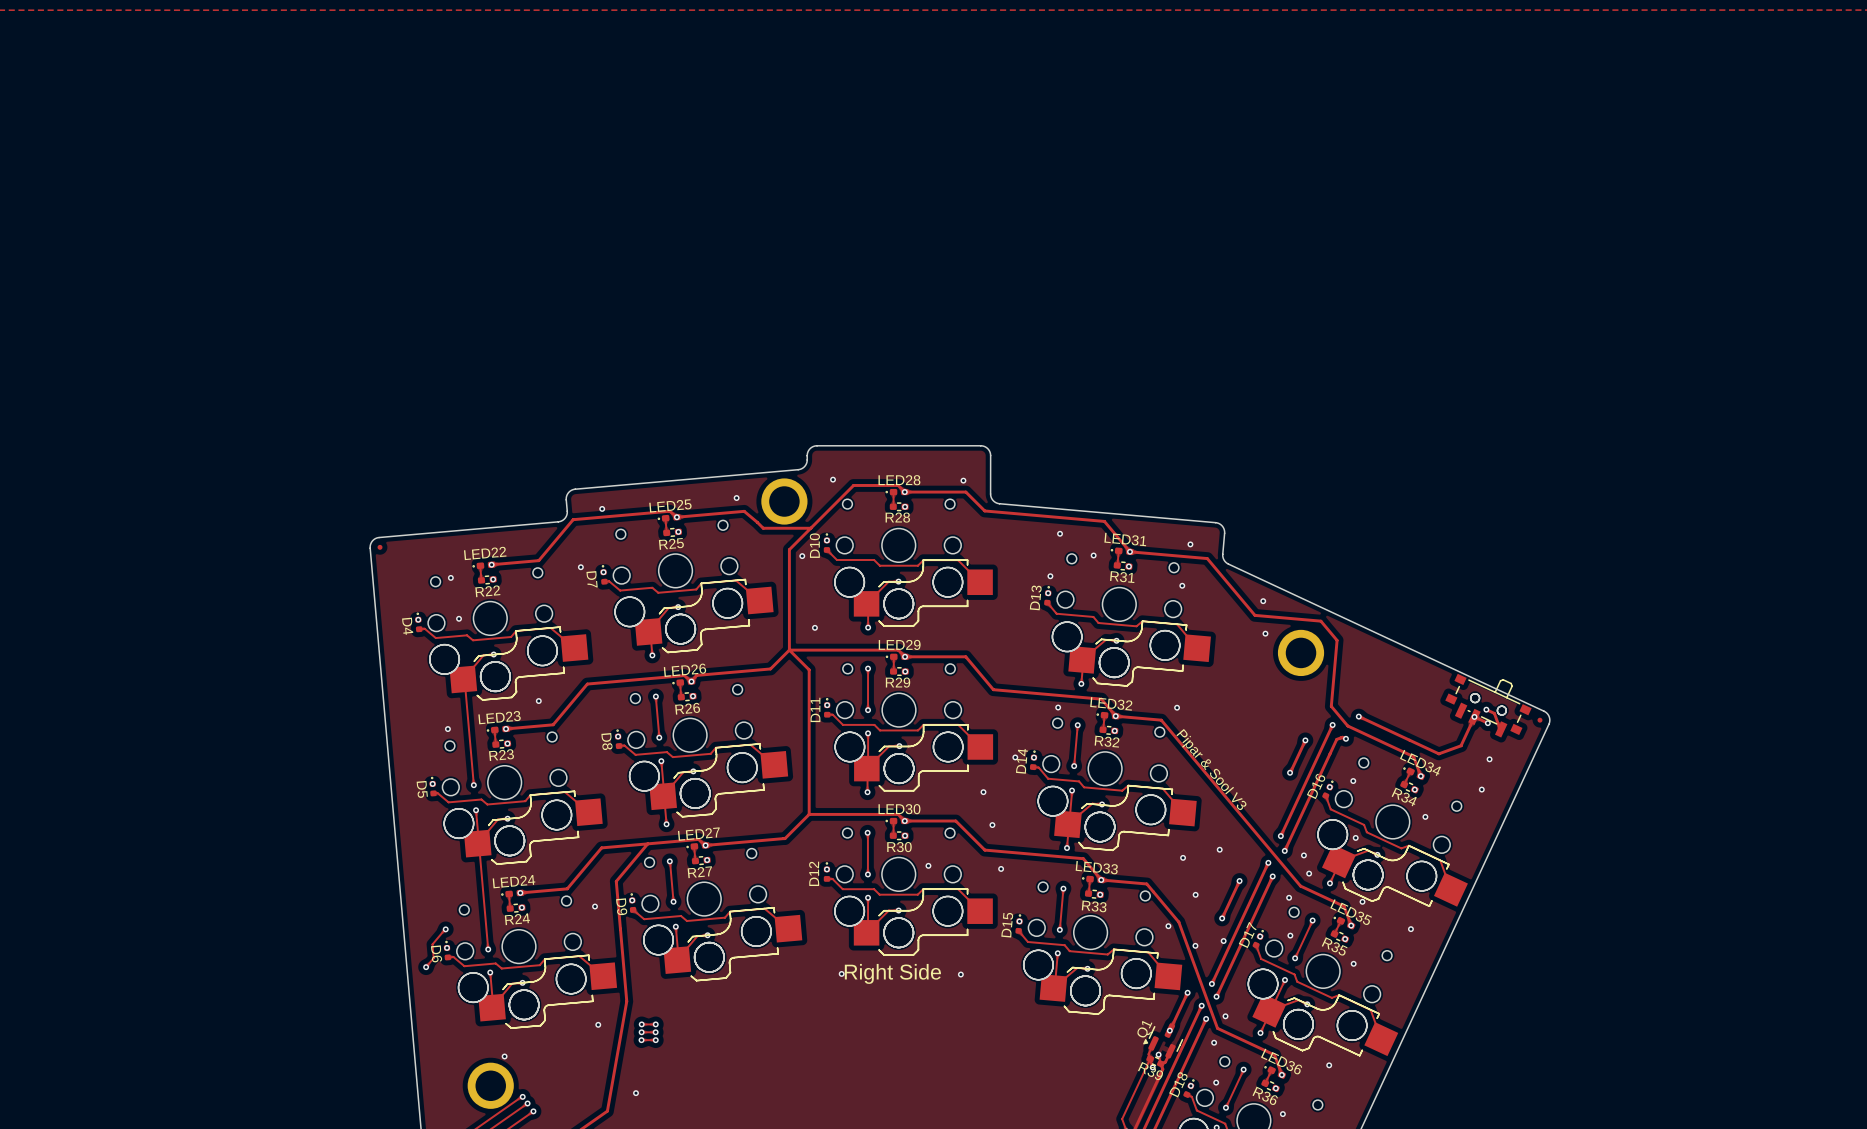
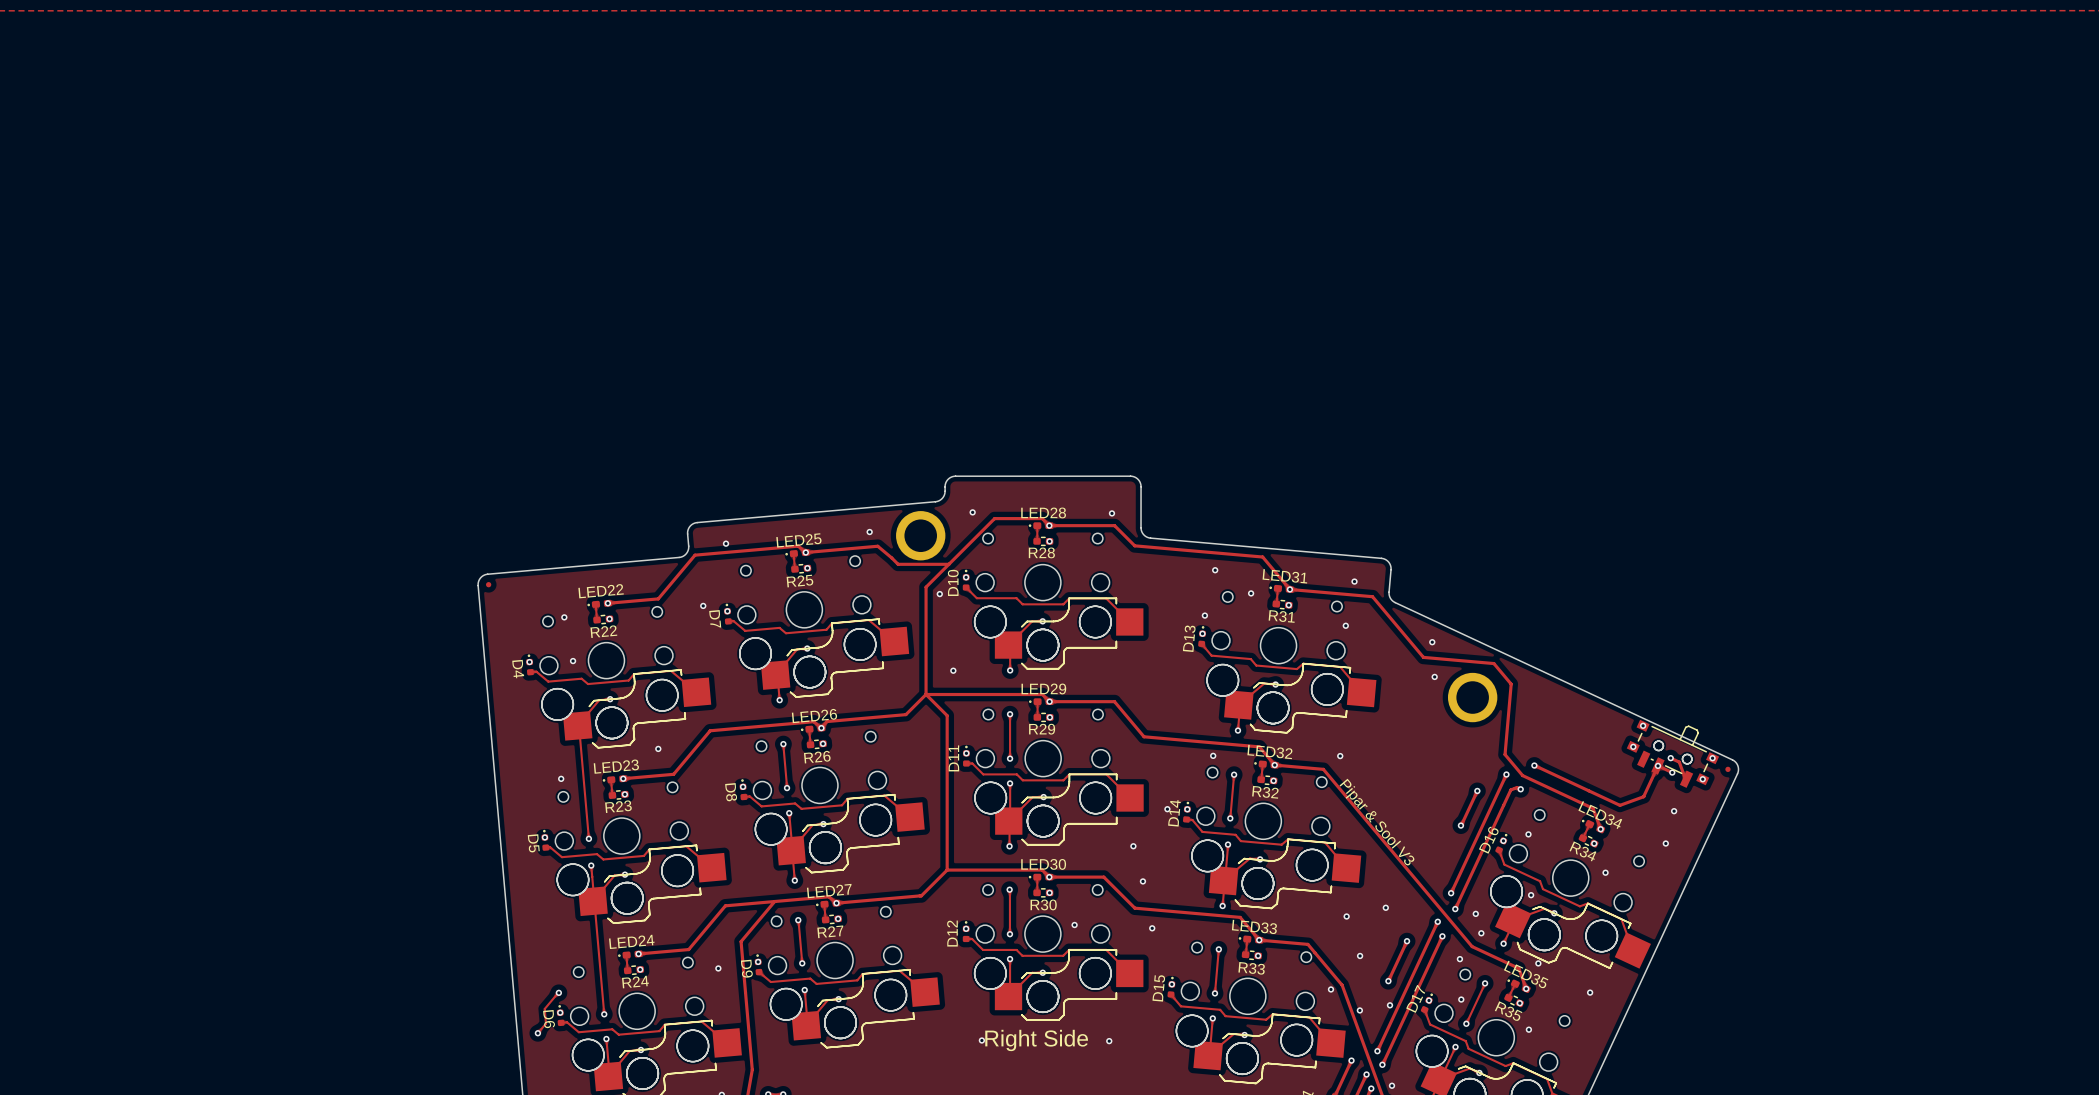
via: none -> (1643, 725)
via: none -> (1633, 746)
via: none -> (1712, 758)
via: none -> (1702, 779)

